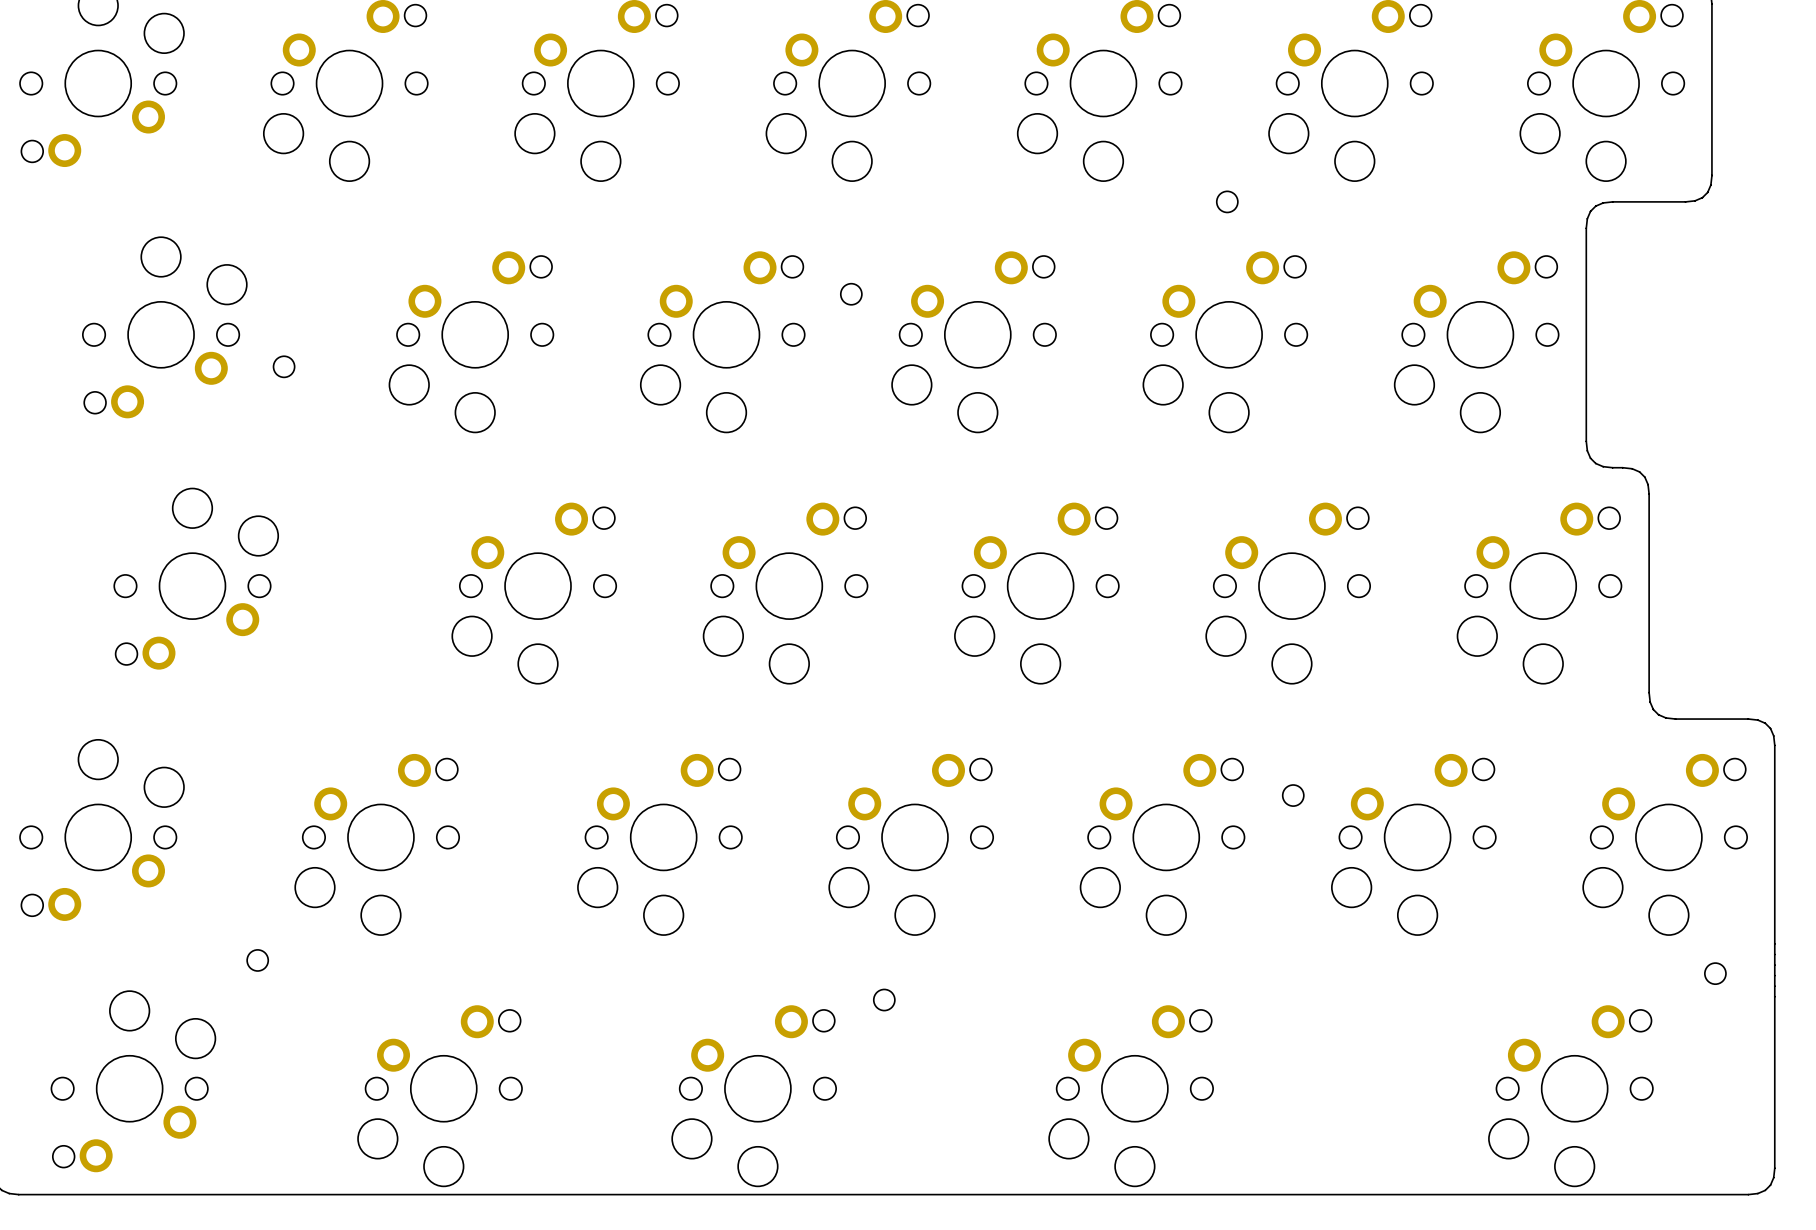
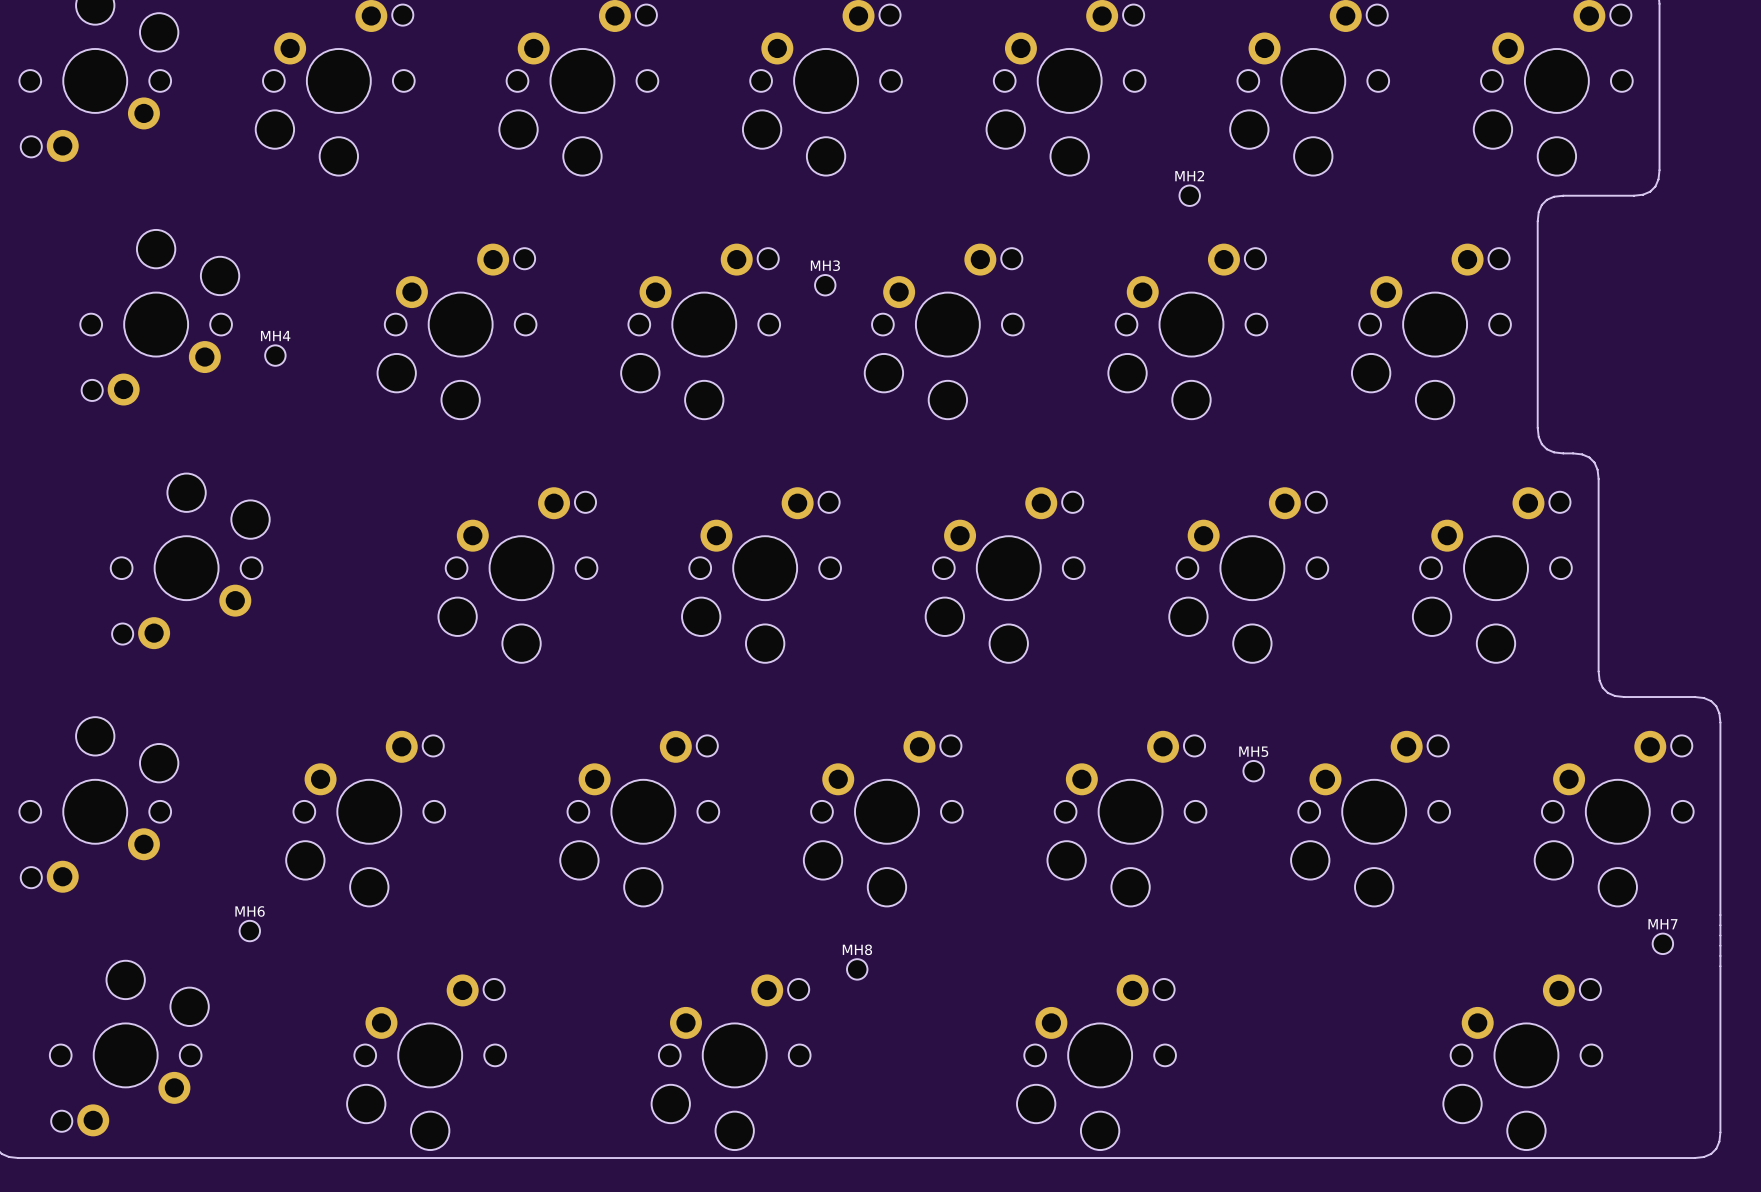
MH2 name: none -> MH2 (1189, 176)
MH3 name: none -> MH3 (825, 265)
MH4 name: none -> MH4 (275, 336)
MH5 name: none -> MH5 (1253, 751)
MH6 name: none -> MH6 (250, 911)
MH7 name: none -> MH7 (1662, 924)
MH8 name: none -> MH8 (857, 949)

